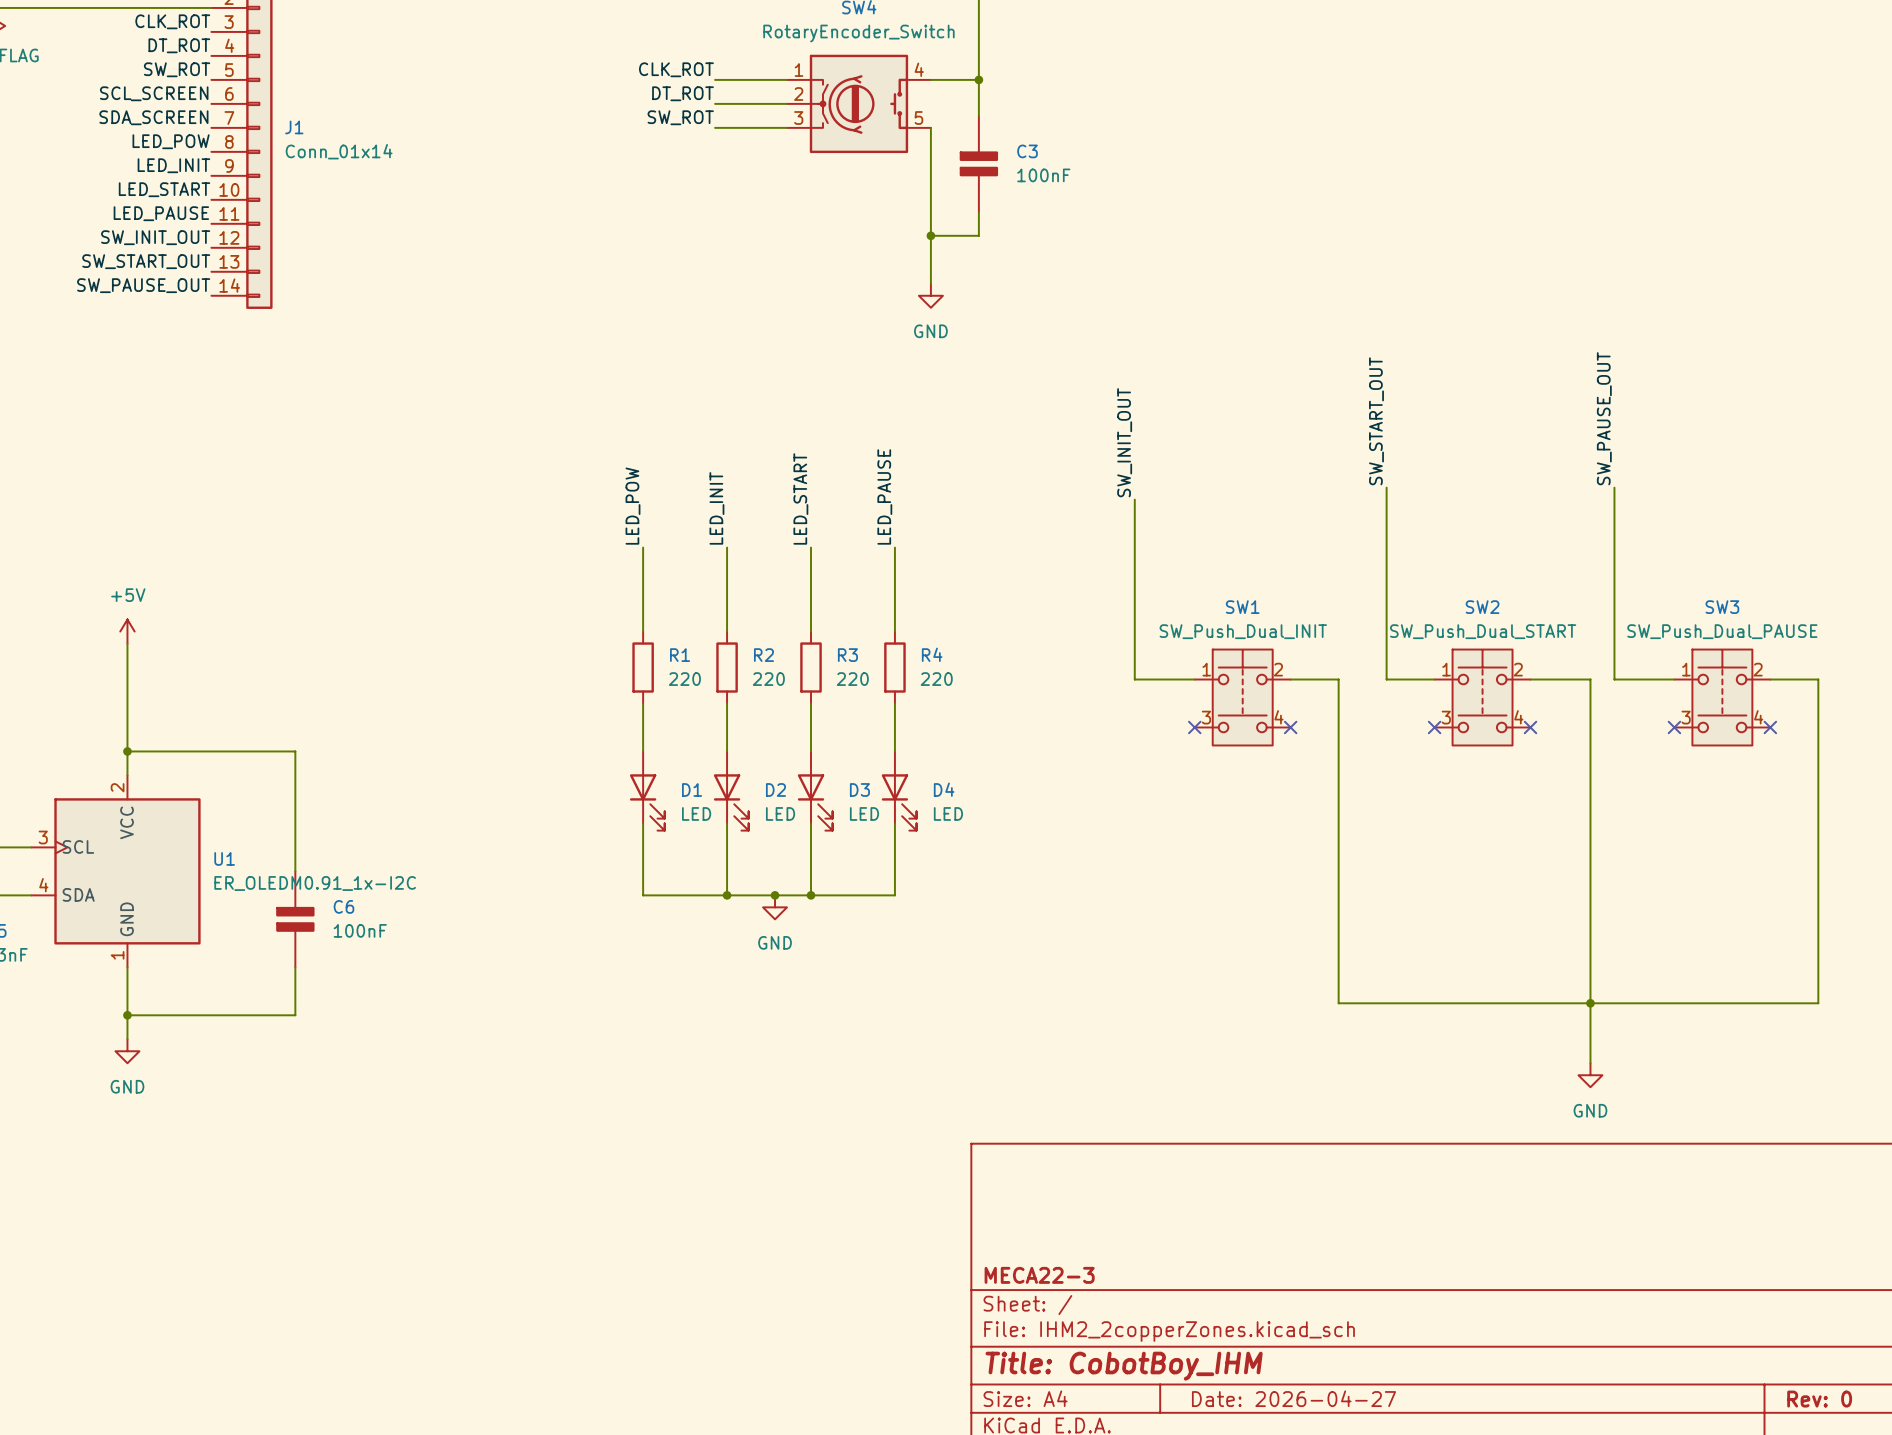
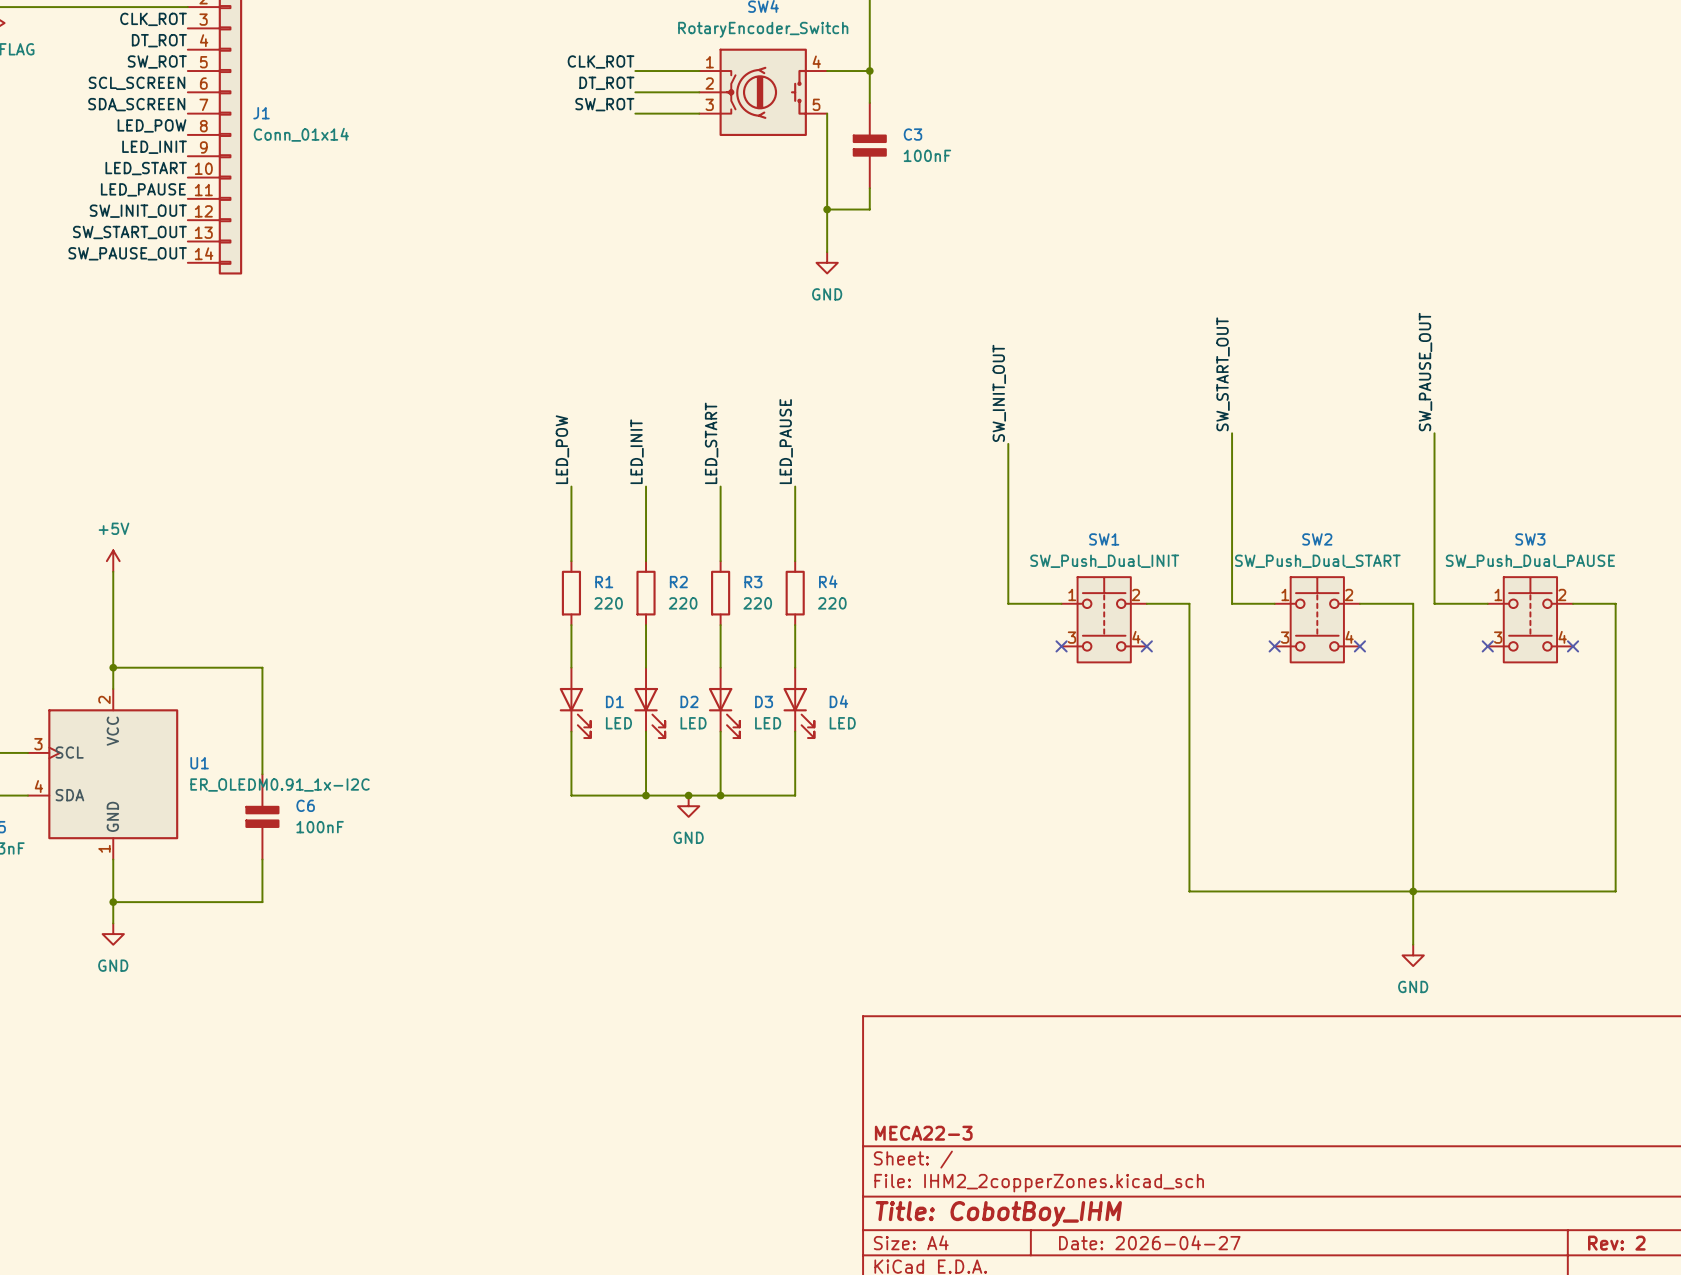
title block: Rev: 0 (1819, 1399) -> Rev: 2 (1616, 1243)

